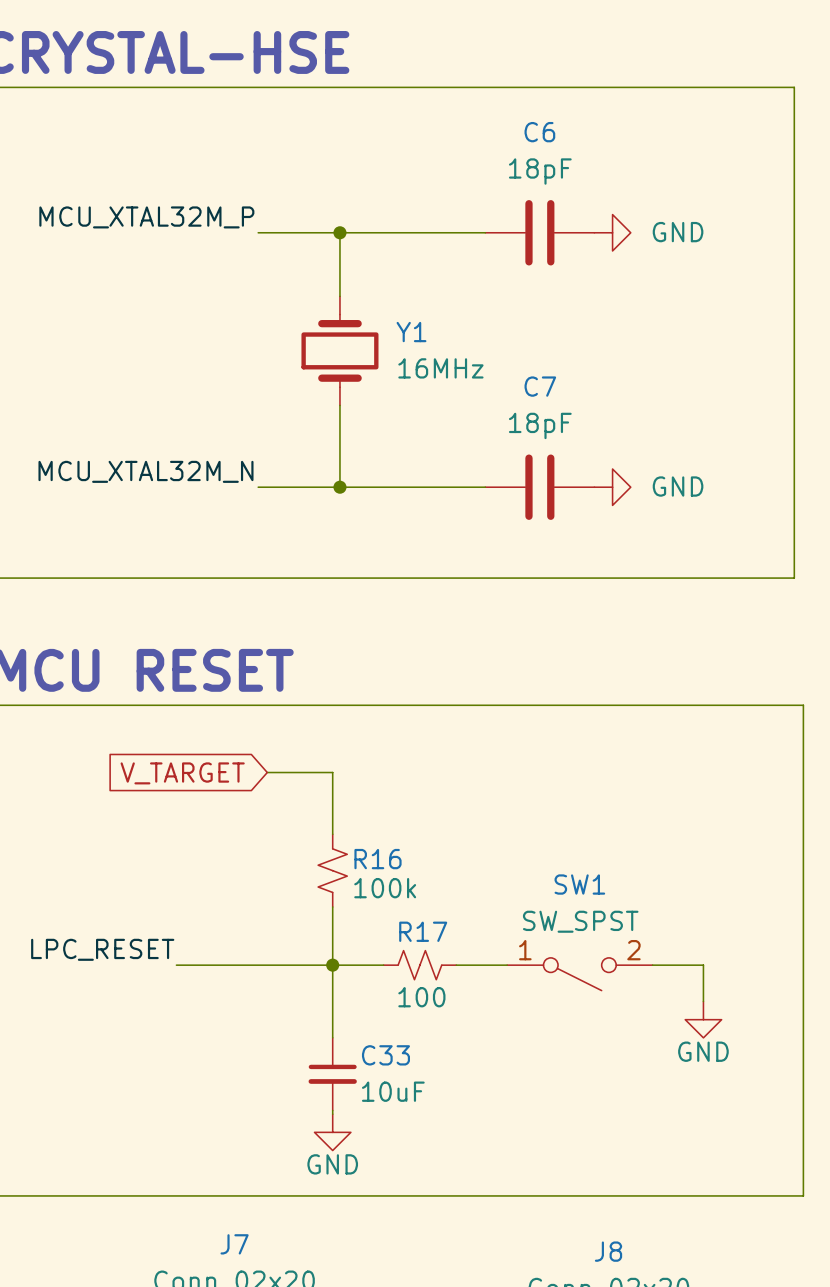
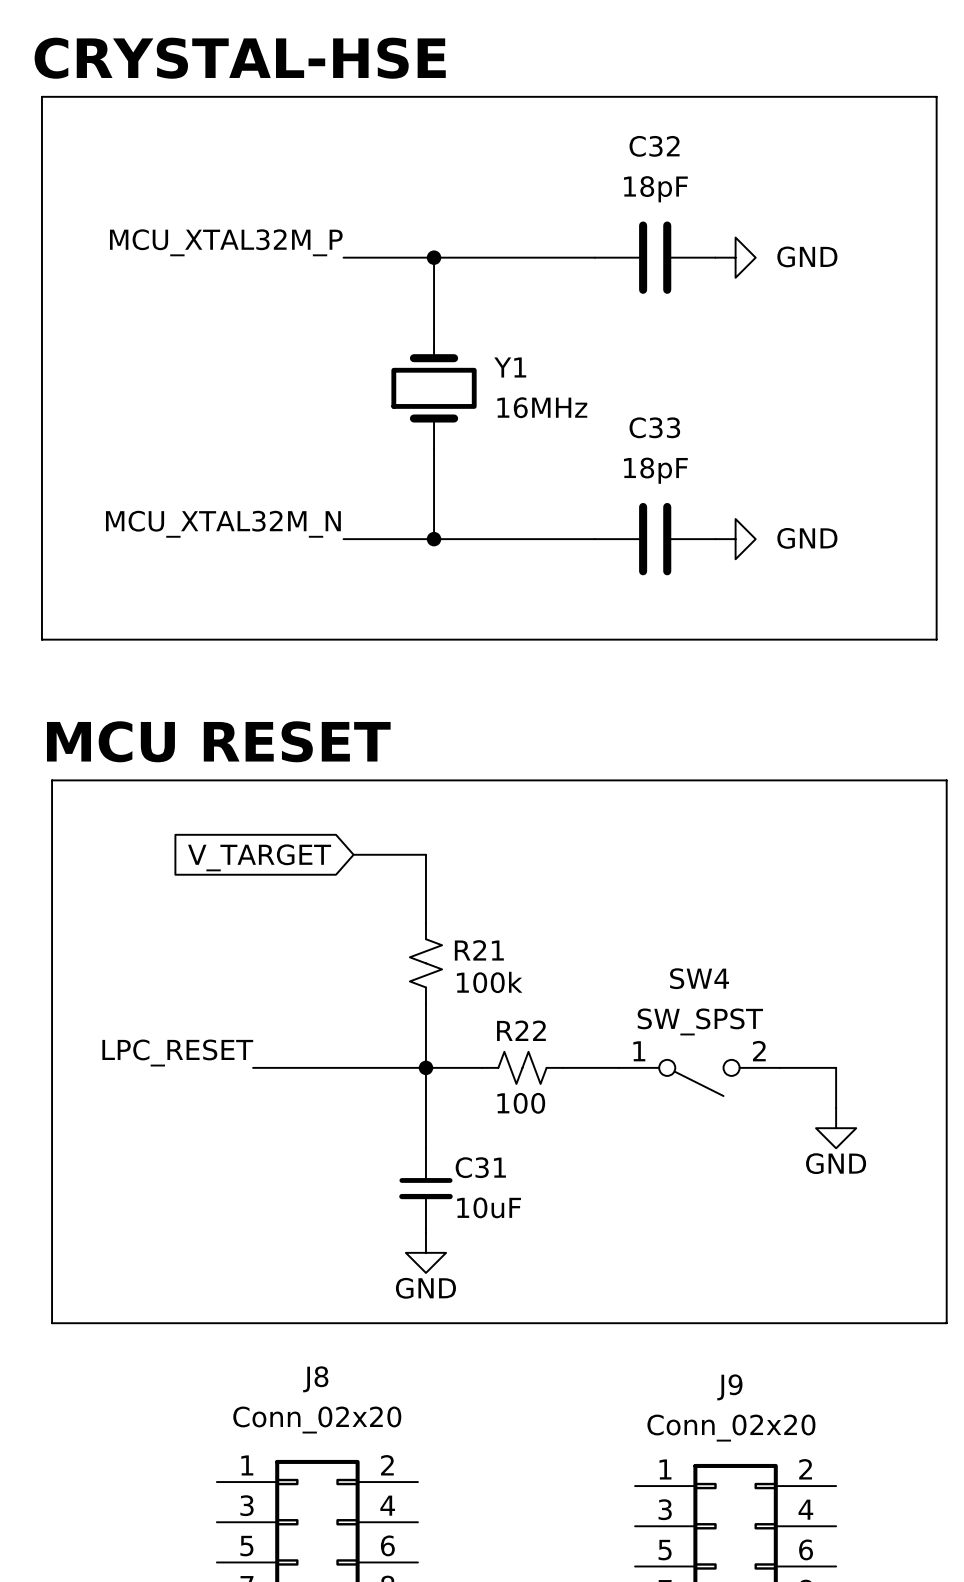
C6 name: C6 (539, 132) -> C32 (654, 146)
C7 name: C7 (540, 386) -> C33 (654, 427)
R16 name: R16 (378, 859) -> R21 (479, 950)
SW1 name: SW1 (579, 884) -> SW4 (699, 978)
R17 name: R17 (423, 931) -> R22 (521, 1030)
C33 name: C33 (385, 1055) -> C31 (480, 1167)
J7 name: J7 (234, 1244) -> J8 (315, 1379)
J8 name: J8 (608, 1251) -> J9 (729, 1387)

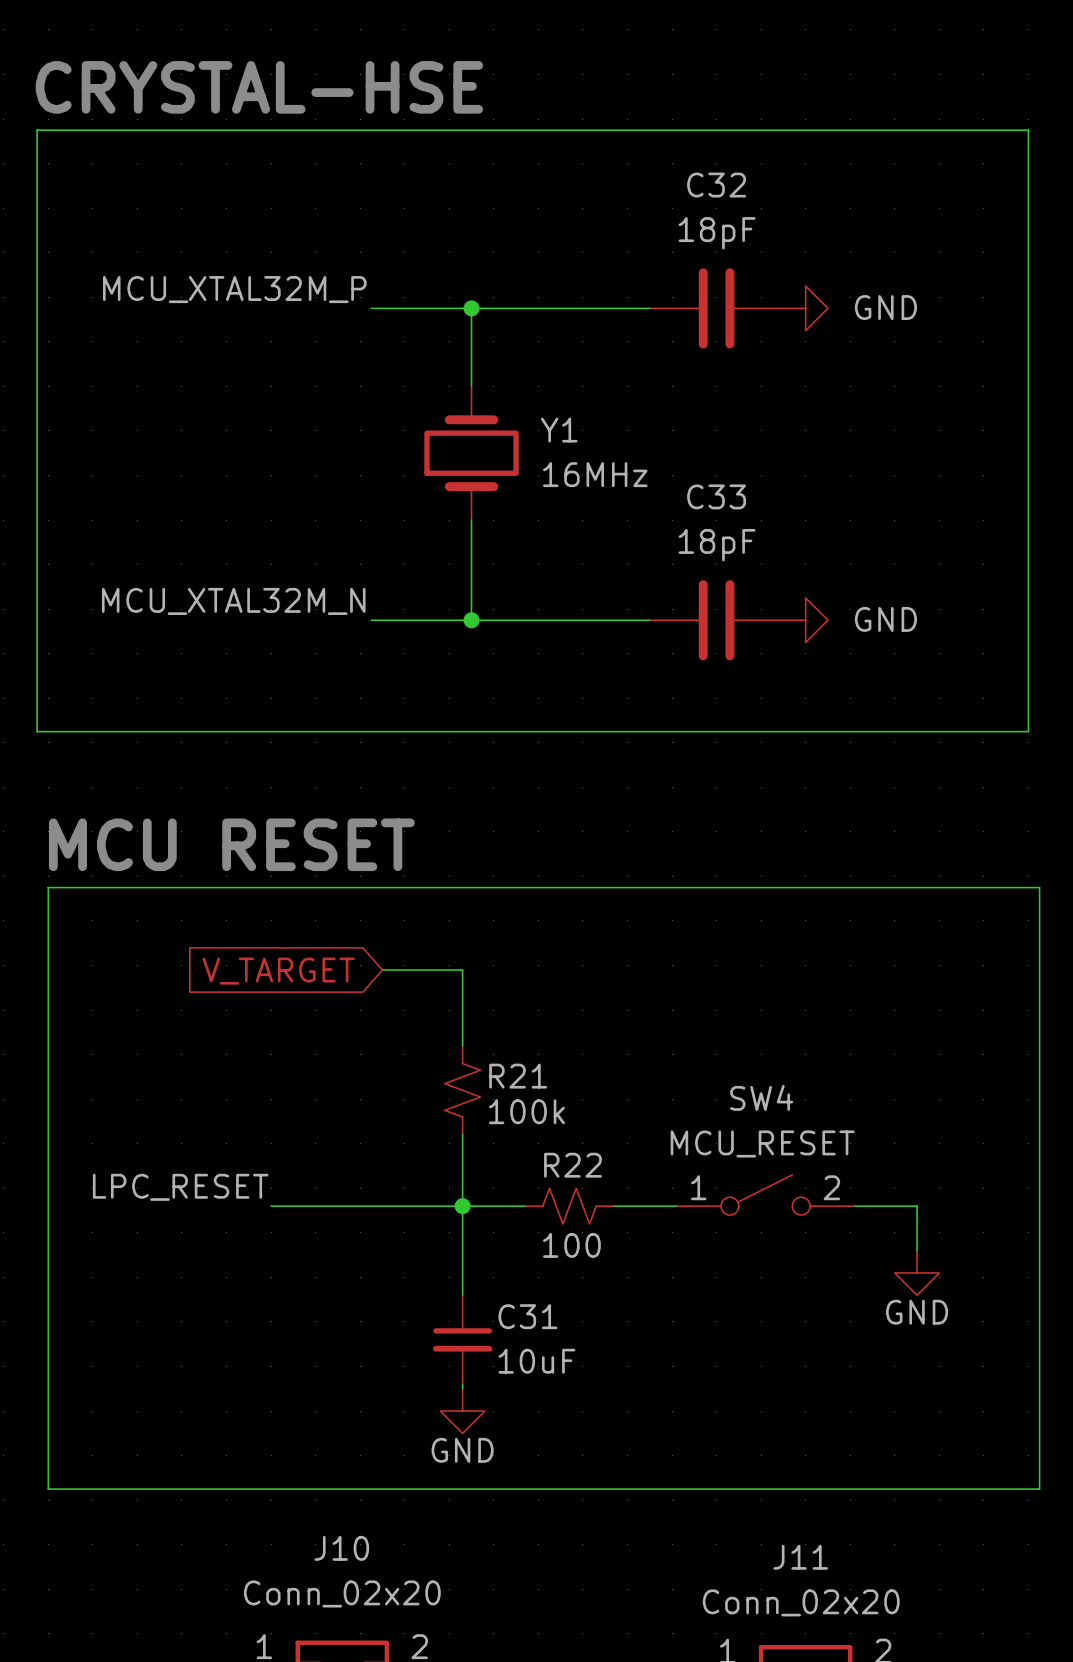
SW4 value: SW_SPST (700, 1021) -> MCU_RESET (762, 1143)
SW4 flip: as is (699, 1077) -> up-down (765, 1195)
J8 name: J8 (315, 1379) -> J10 (341, 1548)
J9 name: J9 (729, 1387) -> J11 (800, 1557)

